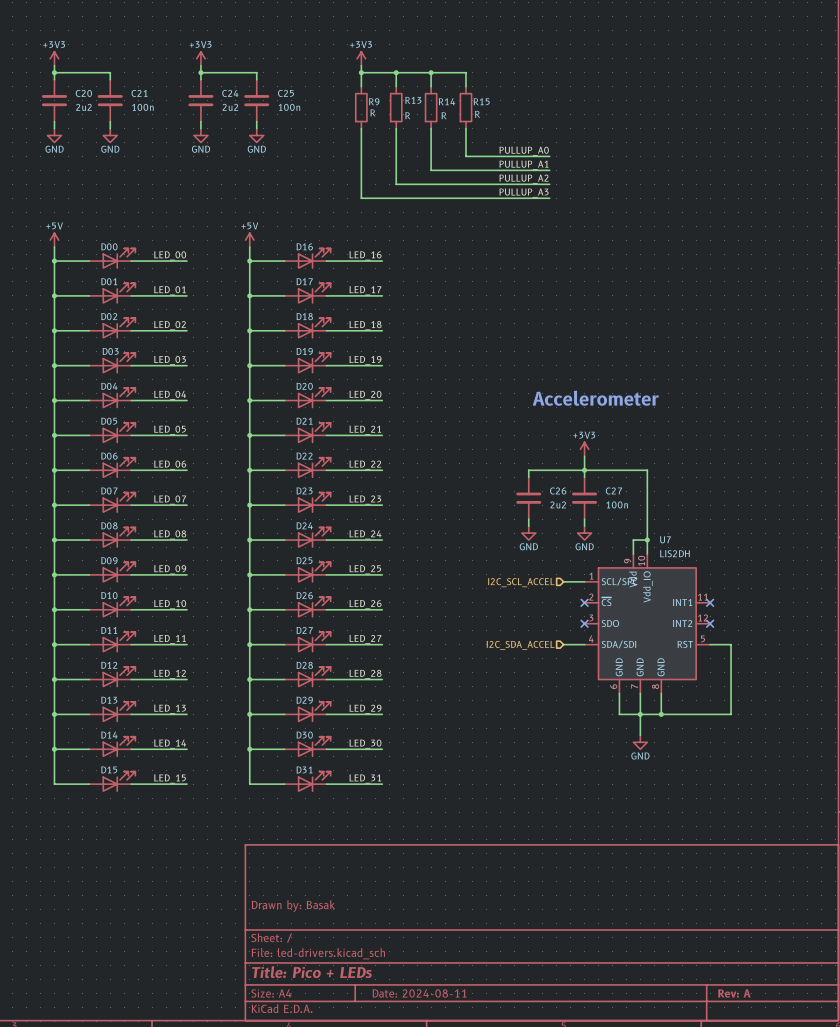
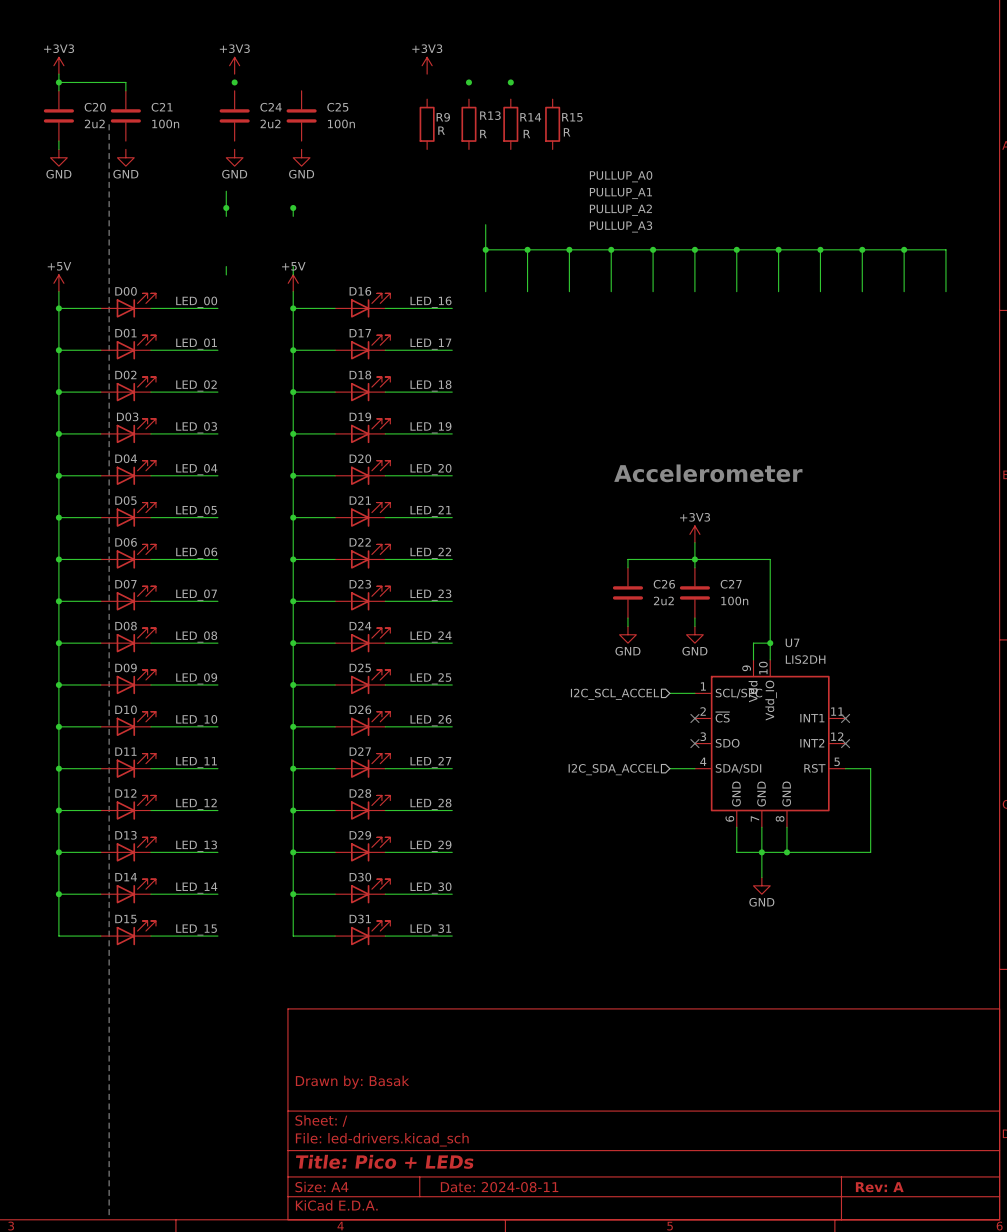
wire: (200, 65) (200, 79) -> none
wire: (361, 65) (361, 86) -> none
wire: (200, 72) (256, 72) (256, 79) -> none
wire: (361, 72) (465, 72) (465, 86) -> none
junction: (361, 72) -> none
wire: (396, 72) (396, 86) -> none
wire: (431, 72) (431, 86) -> none
line: none -> (109, 124) (109, 1216)
wire: (110, 121) (110, 128) -> none
wire: (200, 121) (200, 128) -> (226, 266) (226, 274)
wire: (256, 121) (256, 128) -> (293, 266) (293, 274)
wire: (361, 128) (361, 198) (549, 198) -> none
wire: (396, 128) (396, 184) (549, 184) -> none
wire: (431, 128) (431, 170) (549, 170) -> none
wire: (465, 128) (465, 156) (549, 156) -> none
wire: none -> (226, 191) (226, 216)
junction: none -> (226, 207)
wire: none -> (293, 207) (293, 216)
junction: none -> (293, 207)
wire: none -> (485, 224) (485, 291)
wire: none -> (485, 249) (945, 249) (945, 291)
junction: none -> (485, 249)
wire: none -> (527, 249) (527, 291)
junction: none -> (527, 249)
wire: none -> (569, 249) (569, 291)
junction: none -> (569, 249)
wire: none -> (611, 249) (611, 291)
junction: none -> (611, 249)
wire: none -> (653, 249) (653, 291)
junction: none -> (653, 249)
wire: none -> (694, 249) (694, 291)
junction: none -> (694, 249)
wire: none -> (736, 249) (736, 291)
junction: none -> (736, 249)
wire: none -> (778, 249) (778, 291)
junction: none -> (778, 249)
wire: none -> (820, 249) (820, 291)
junction: none -> (820, 249)
wire: none -> (862, 249) (862, 291)
junction: none -> (862, 249)
wire: none -> (904, 249) (904, 291)
junction: none -> (904, 249)

